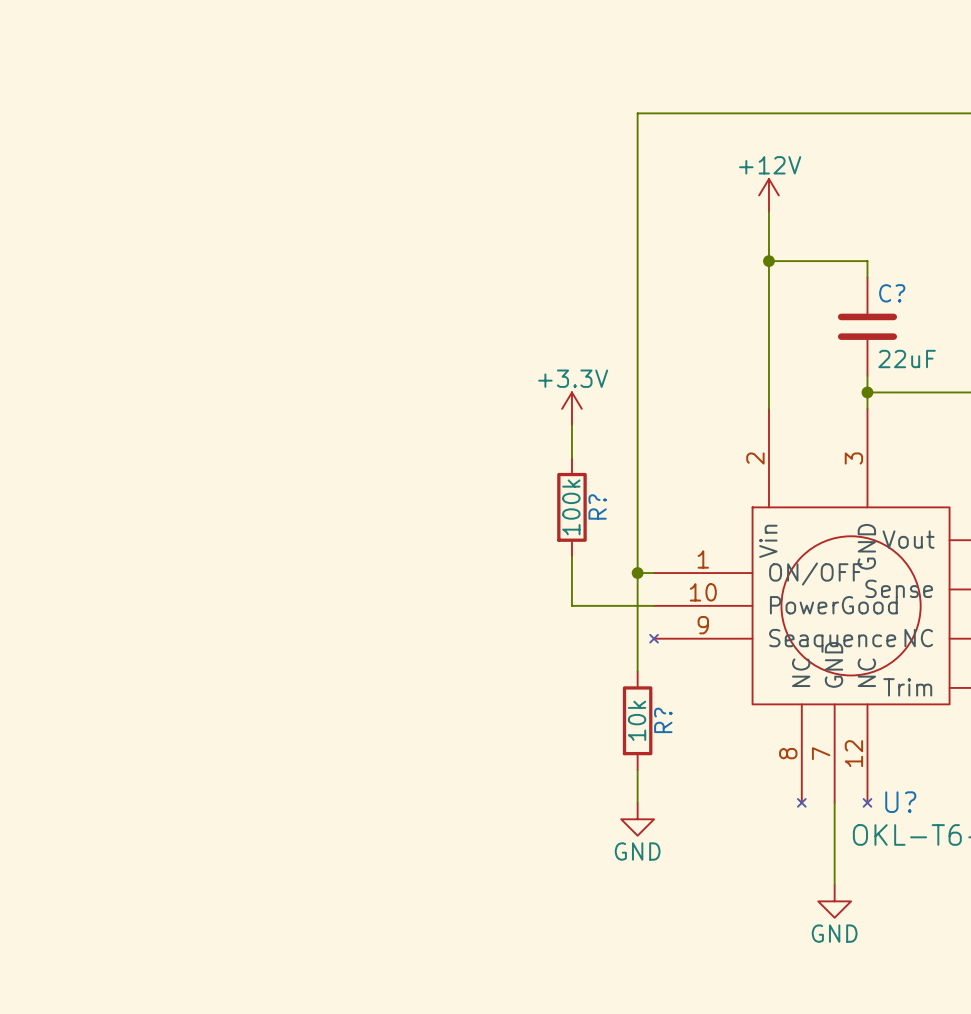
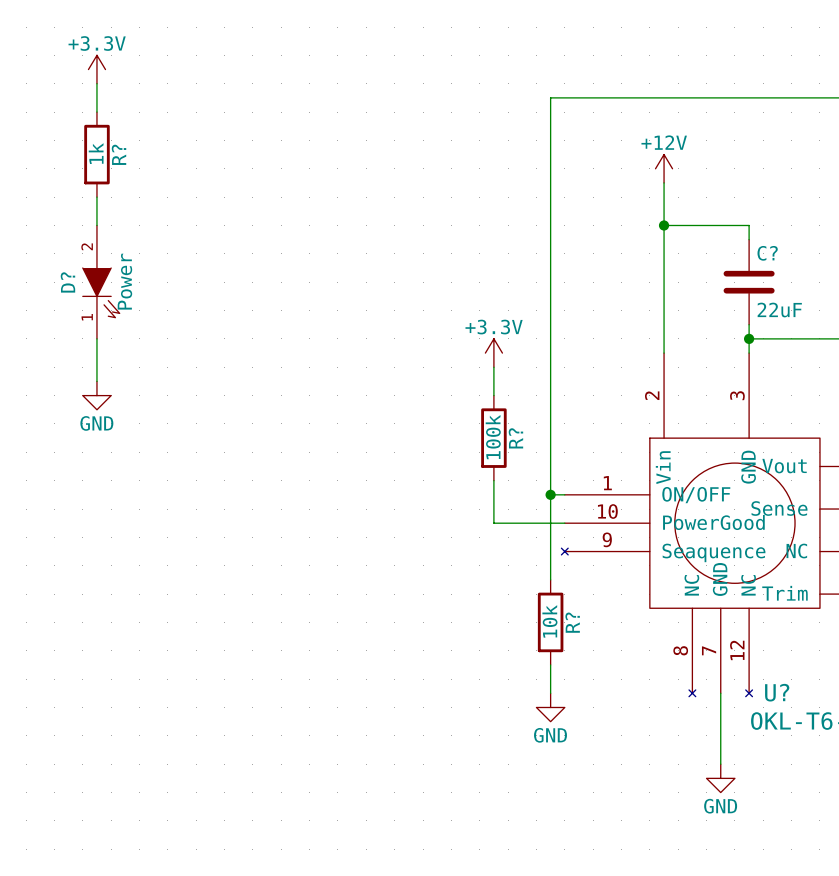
power symbol: none -> +3.3V (96, 69)
wire: none -> (96, 83) (96, 112)
R?: none -> 1k (96, 154)
wire: none -> (96, 197) (96, 225)
D?: none -> Power (101, 282)
wire: none -> (96, 338) (96, 381)
power symbol: none -> GND (96, 395)

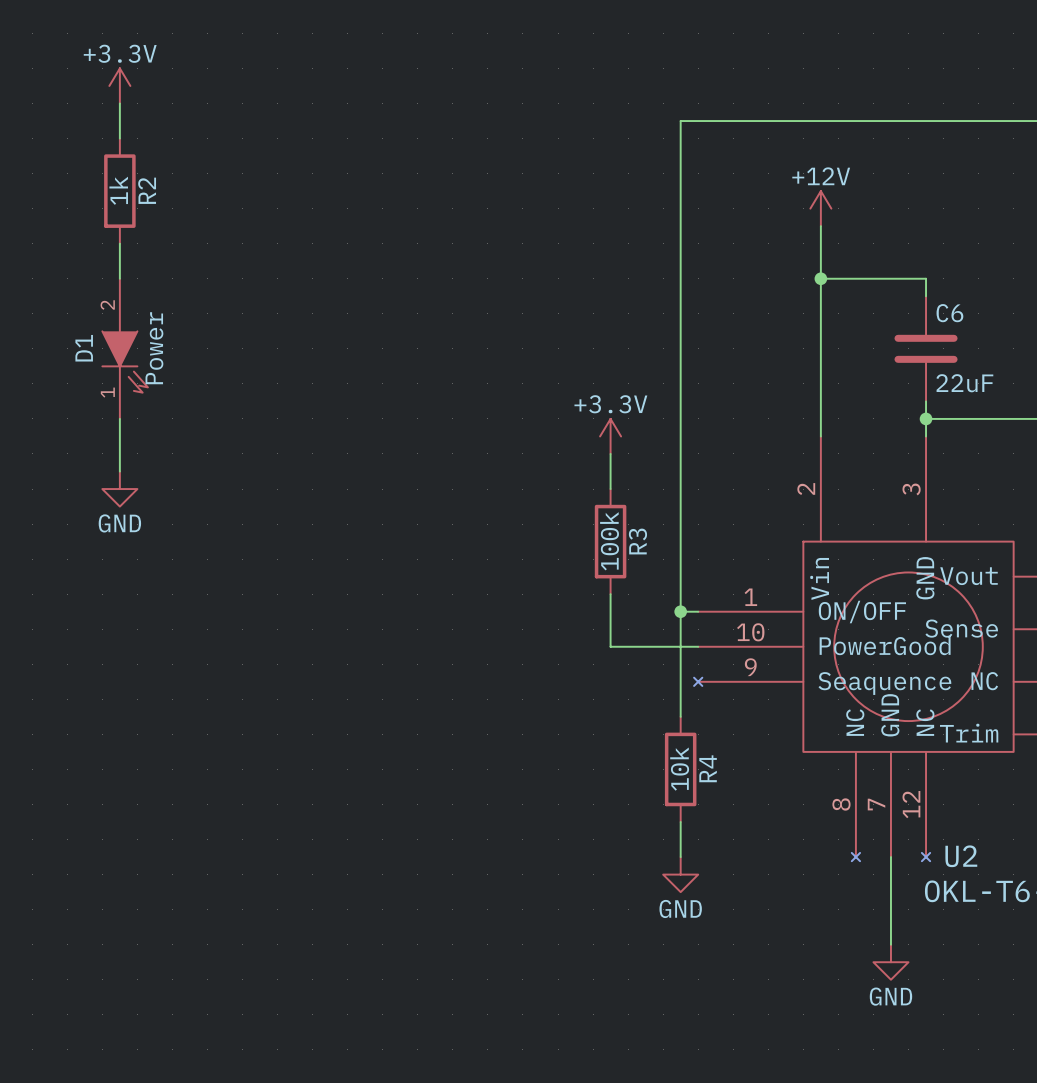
R? name: R? (119, 154) -> R2 (147, 190)
C? name: C? (767, 253) -> C6 (949, 313)
D? name: D? (67, 282) -> D1 (84, 348)
R? name: R? (515, 438) -> R3 (637, 541)
R? name: R? (572, 622) -> R4 (708, 768)
U? name: U? (777, 692) -> U2 (961, 856)

